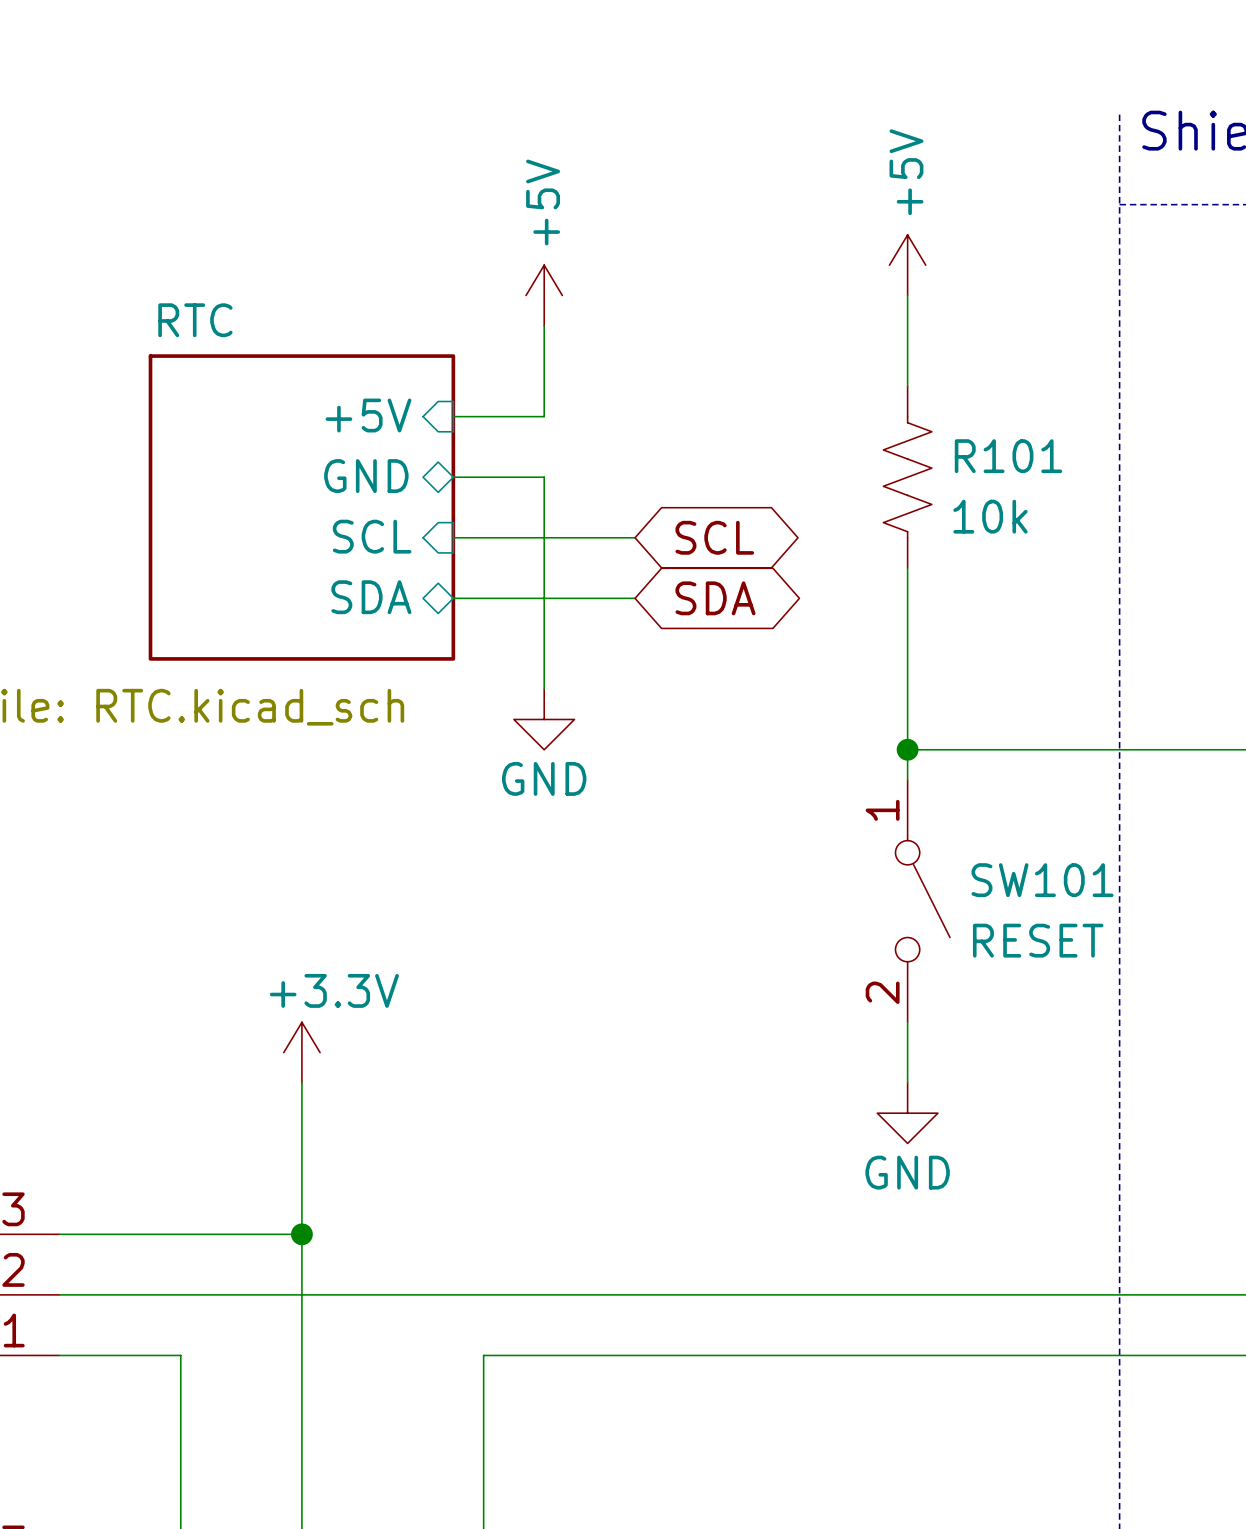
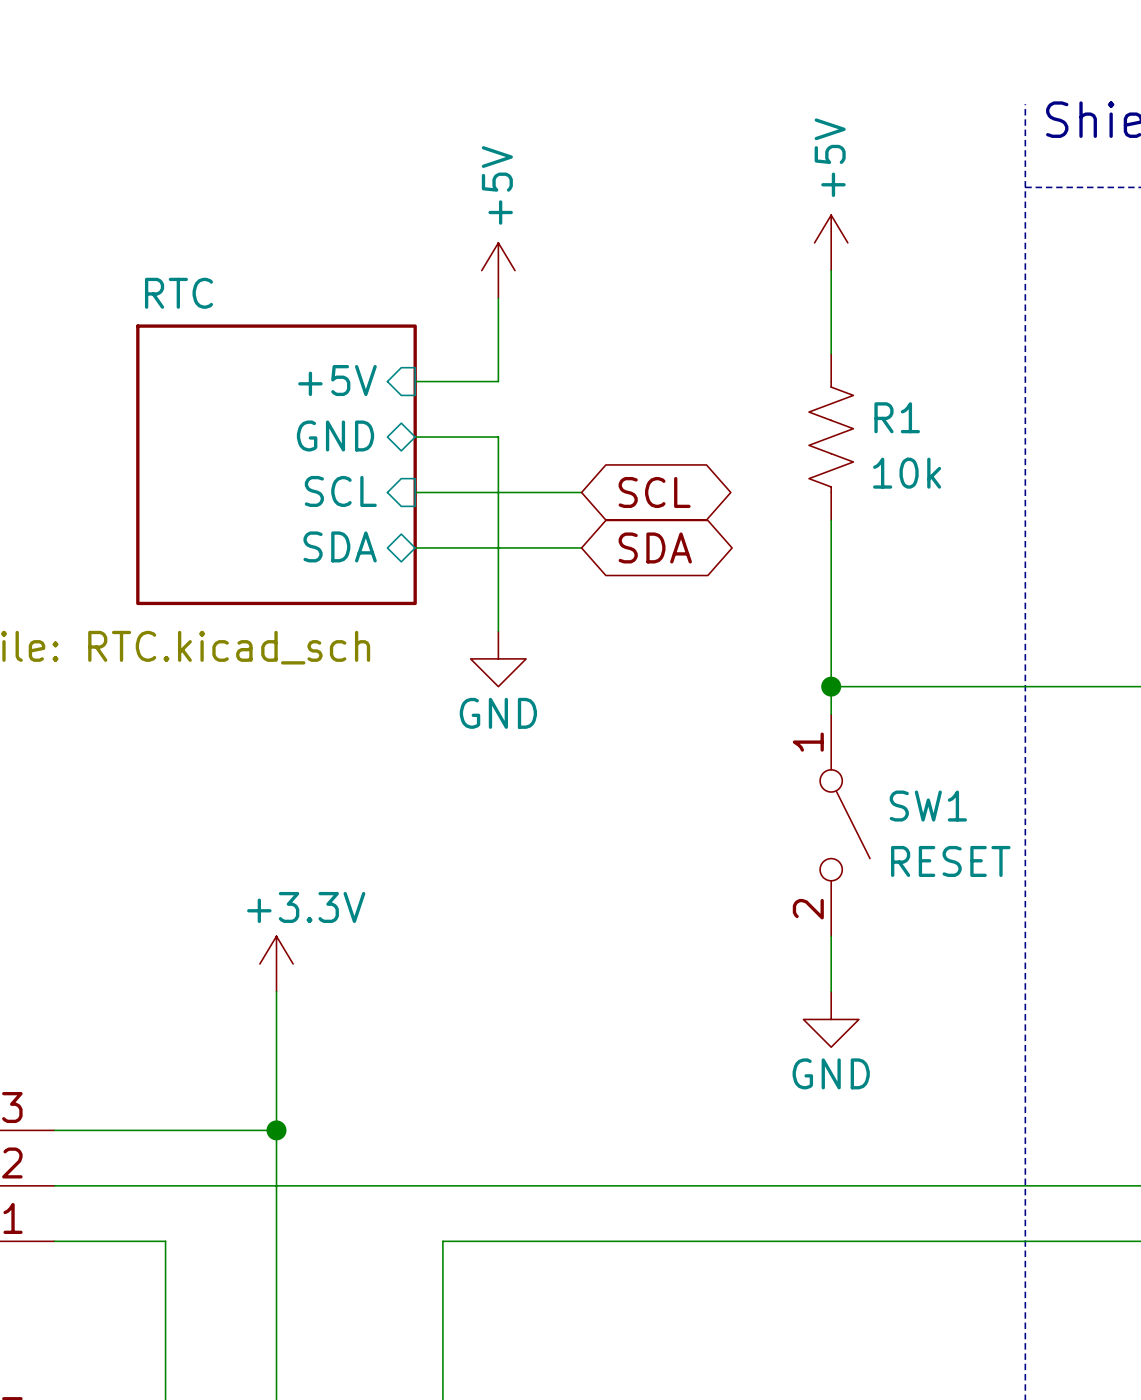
R101 name: R101 (1008, 456) -> R1 (897, 417)
SW101 name: SW101 (1042, 880) -> SW1 (928, 806)

